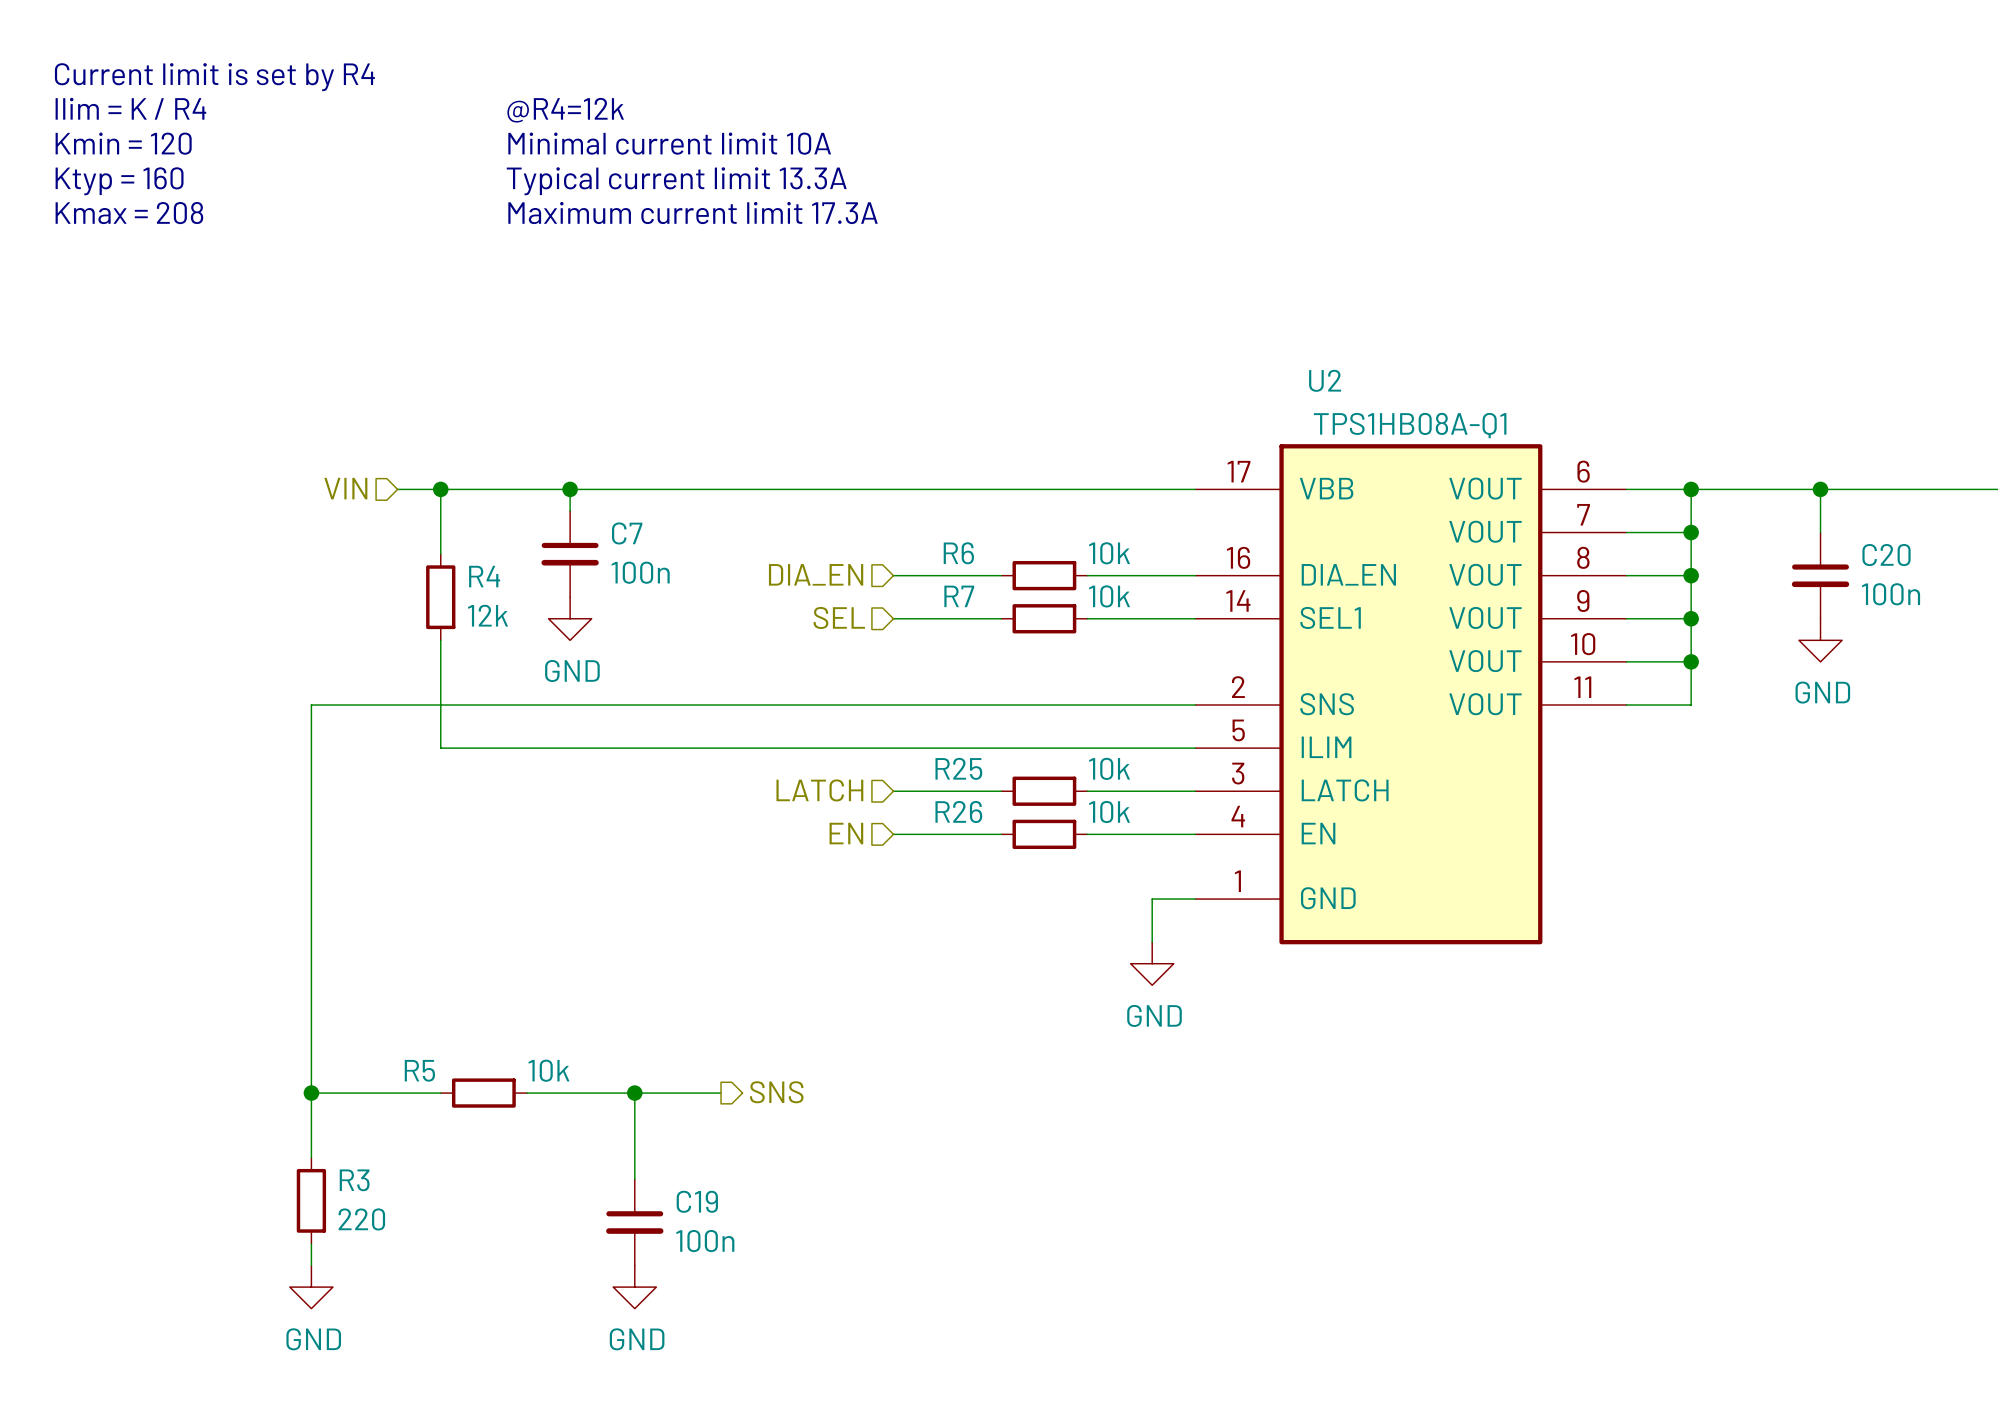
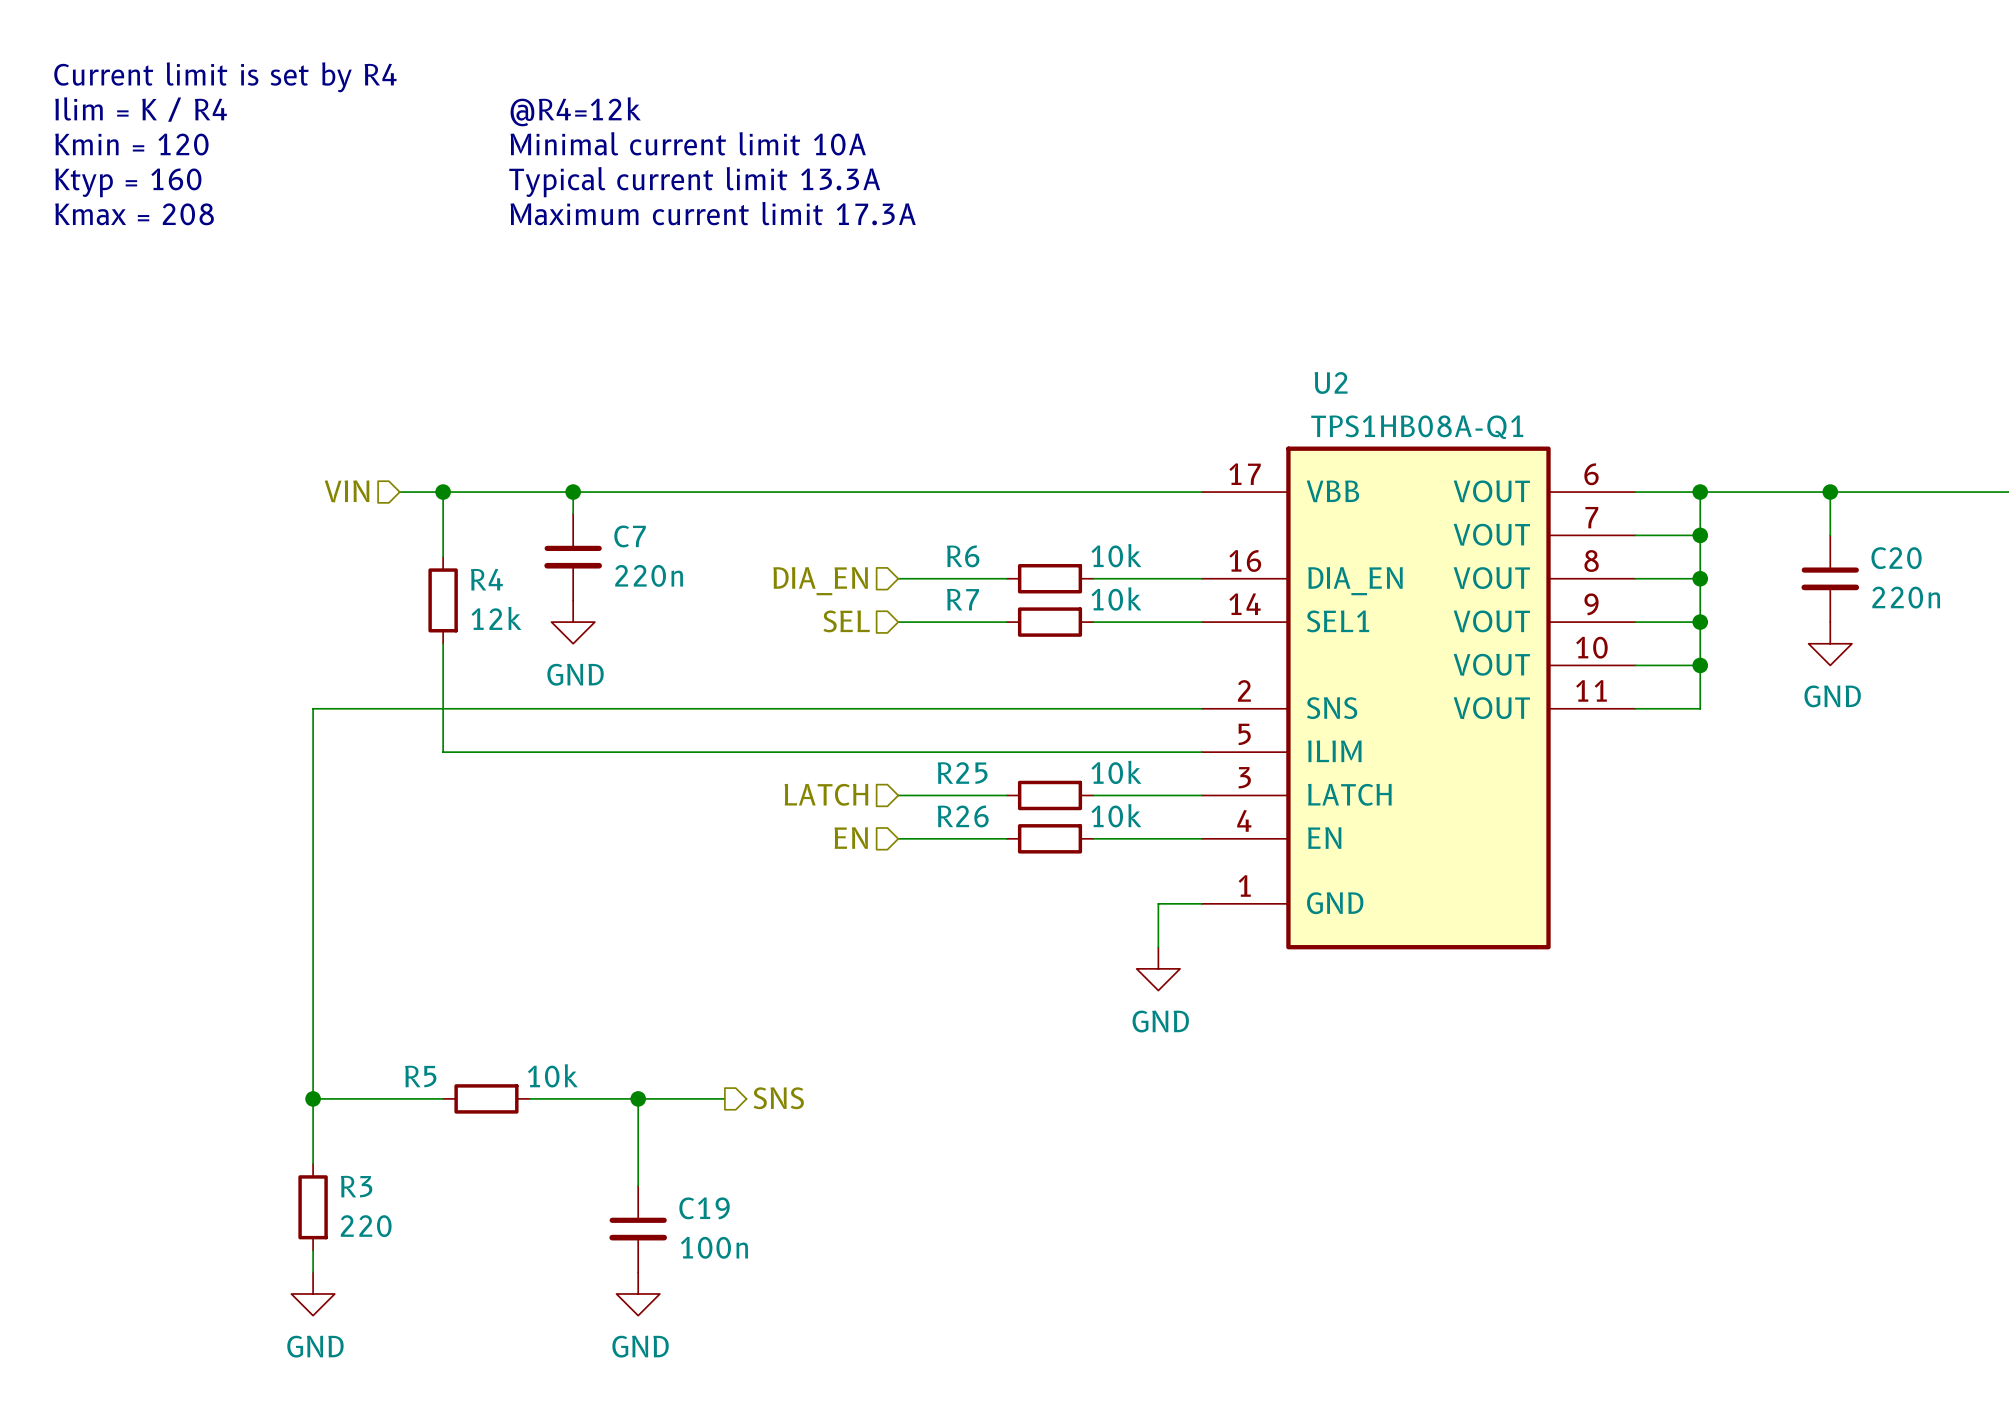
C7 value: 100n (640, 572) -> 220n (649, 575)
C20 value: 100n (1891, 594) -> 220n (1906, 597)

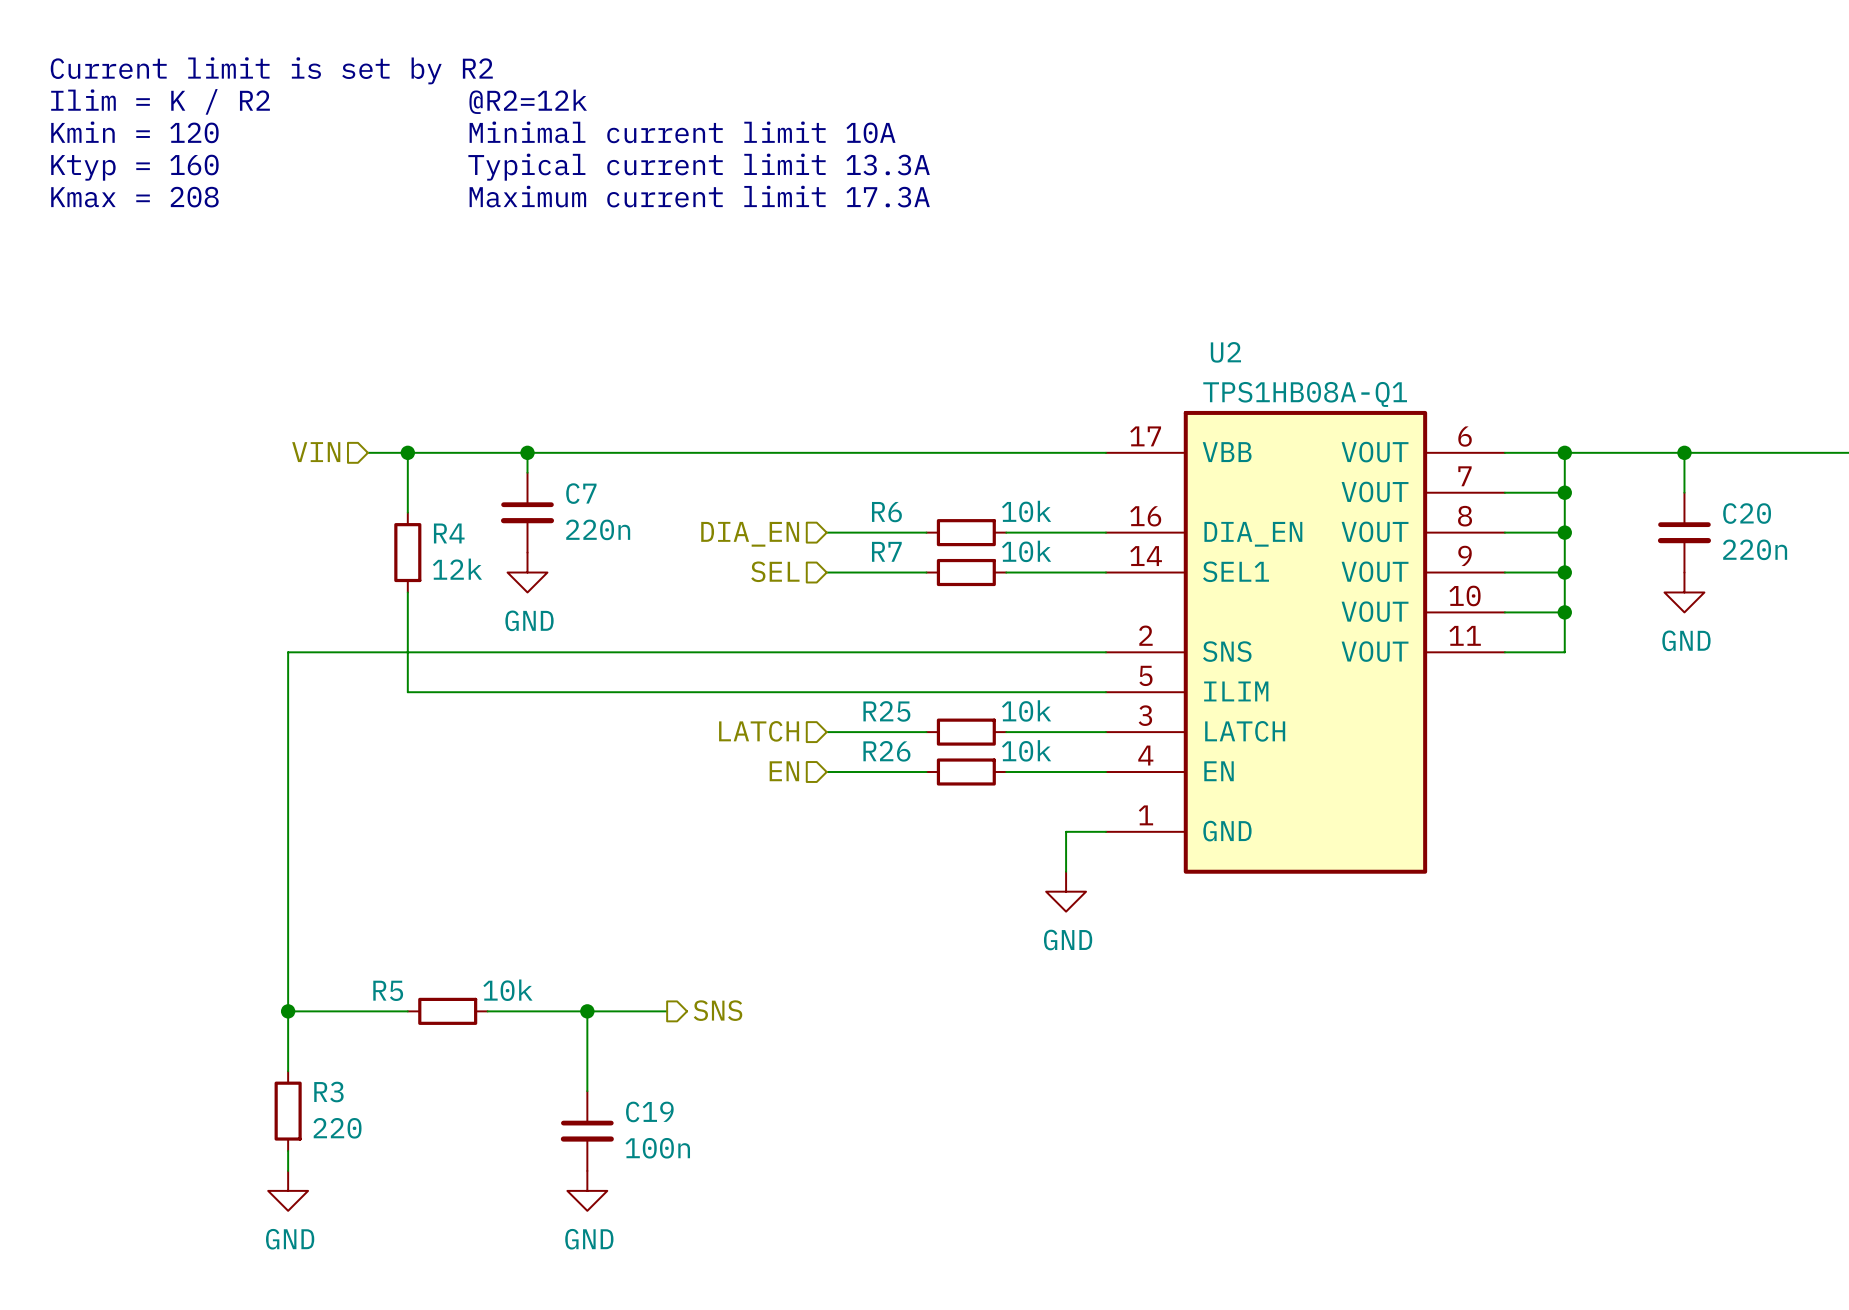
text: Current limit is set by R4 (225, 77) -> Current limit is set by R2 (271, 70)
text: Ilim = K / R4 (141, 109) -> Ilim = K / R2 (160, 101)
text: @R4=12k (575, 111) -> @R2=12k (528, 101)

